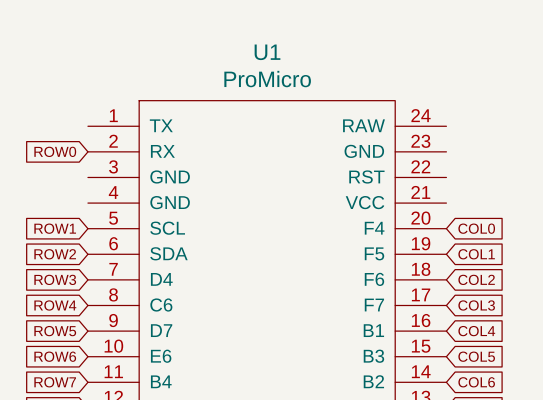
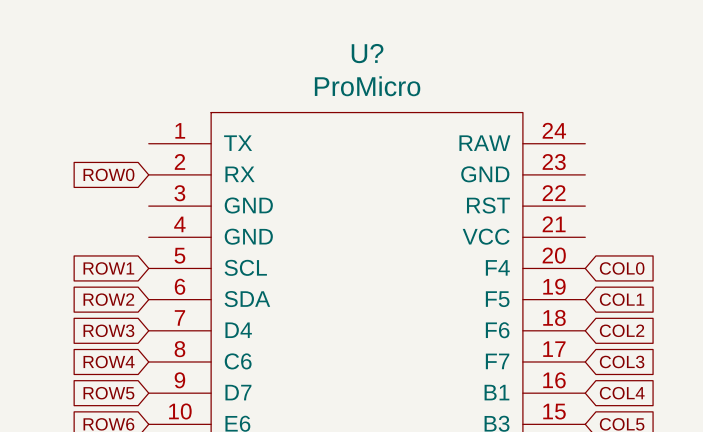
U1 name: U1 (267, 52) -> U? (367, 53)

